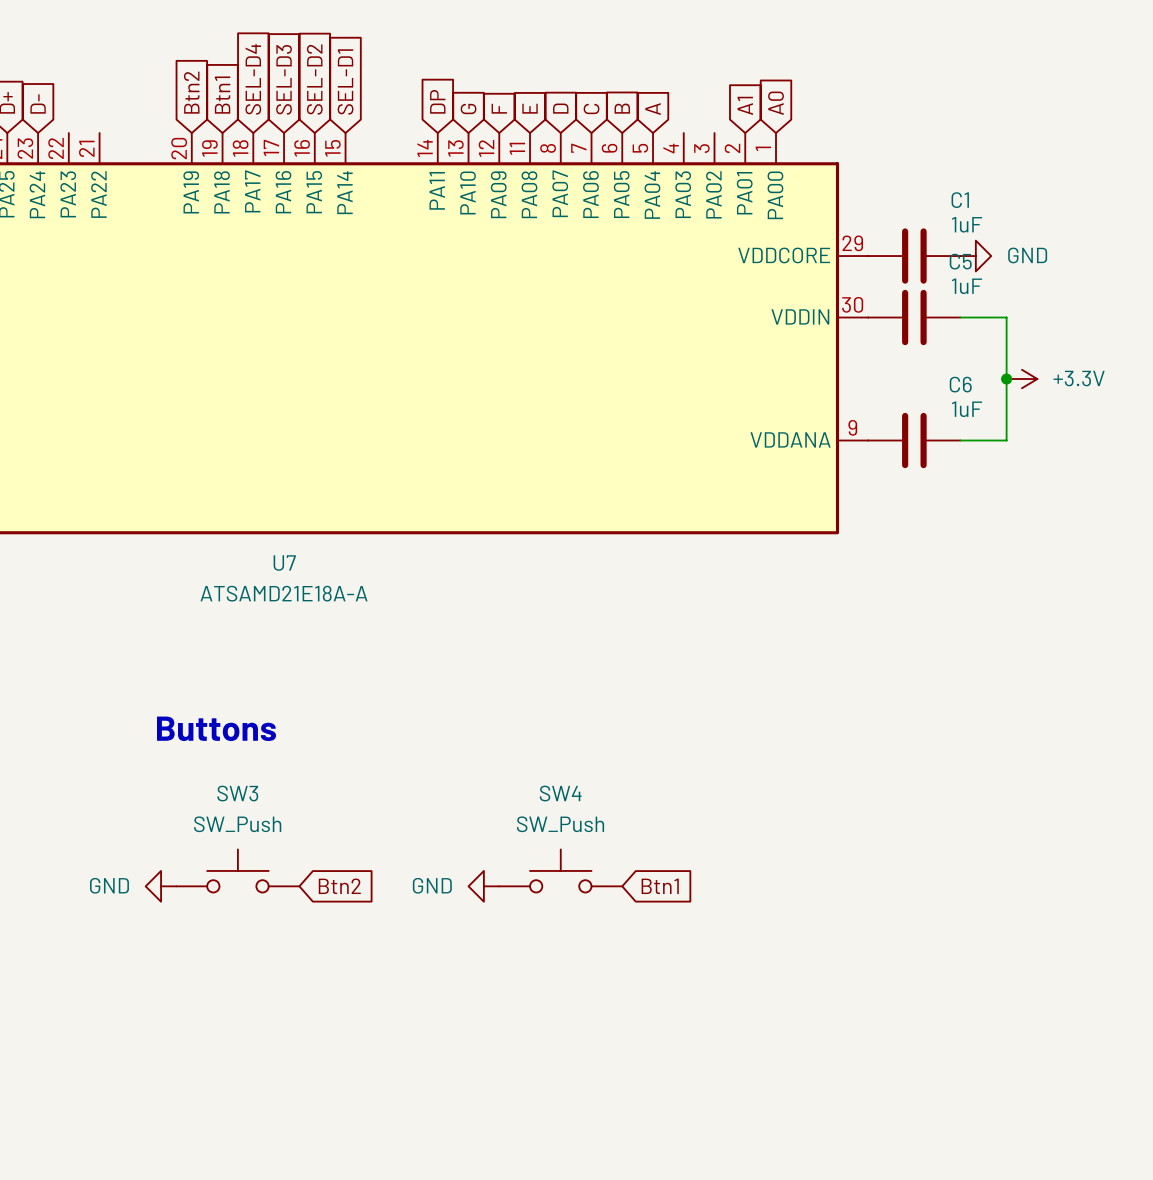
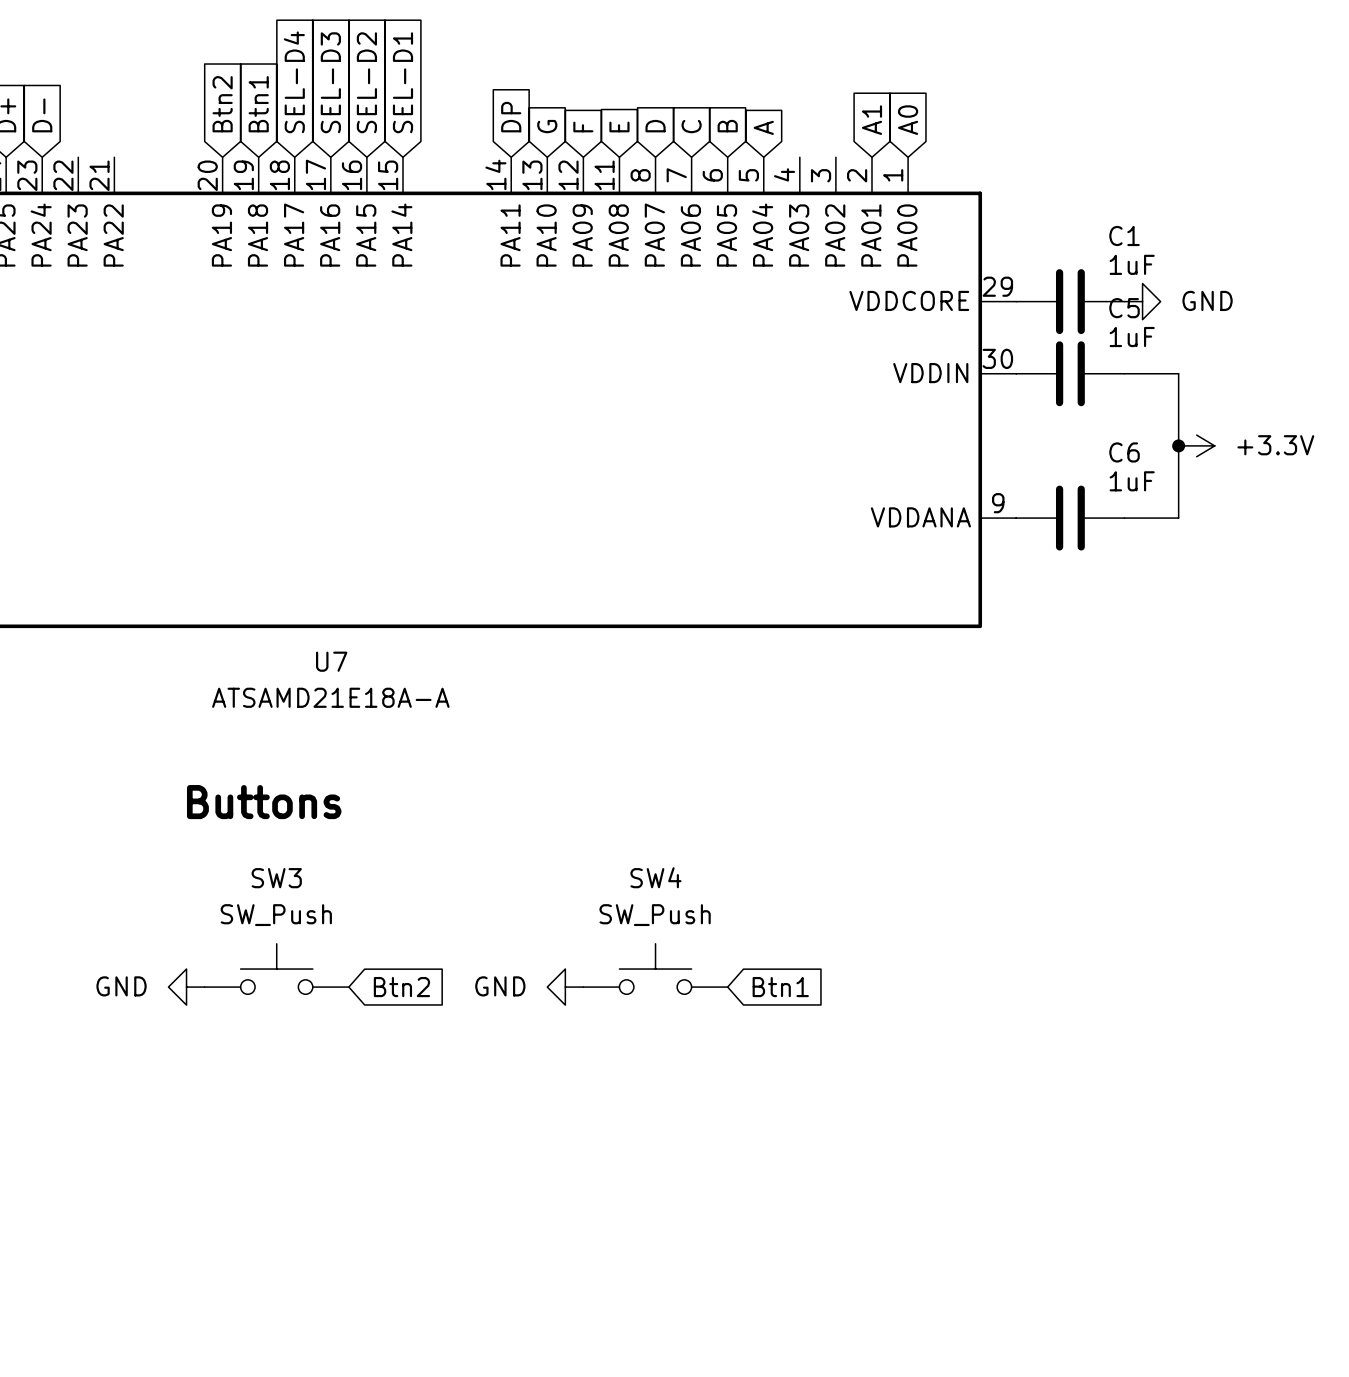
text position: Buttons (216, 728) -> Buttons (264, 802)
SW3 position: (237, 870) -> (276, 969)
SW4 position: (560, 870) -> (655, 969)
power symbol position: GND (161, 886) -> GND (186, 987)
global label position: Btn2 (339, 886) -> Btn2 (401, 987)
power symbol position: GND (483, 886) -> GND (565, 987)
global label position: Btn1 (660, 886) -> Btn1 (780, 987)

